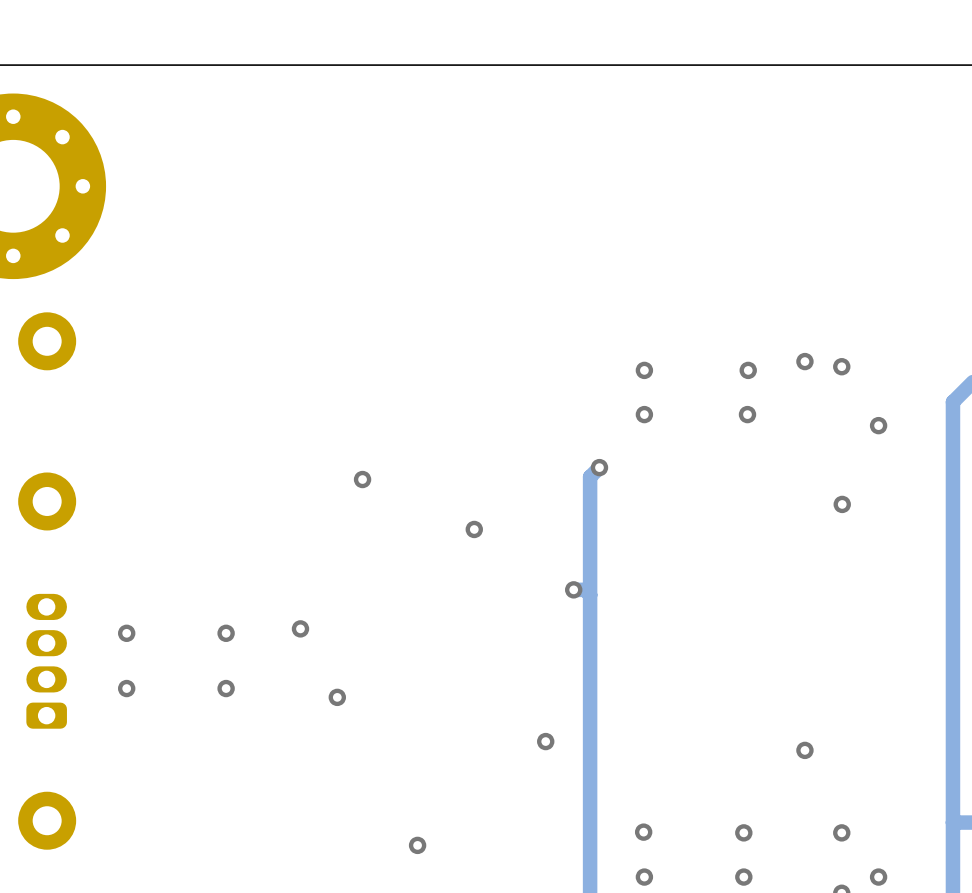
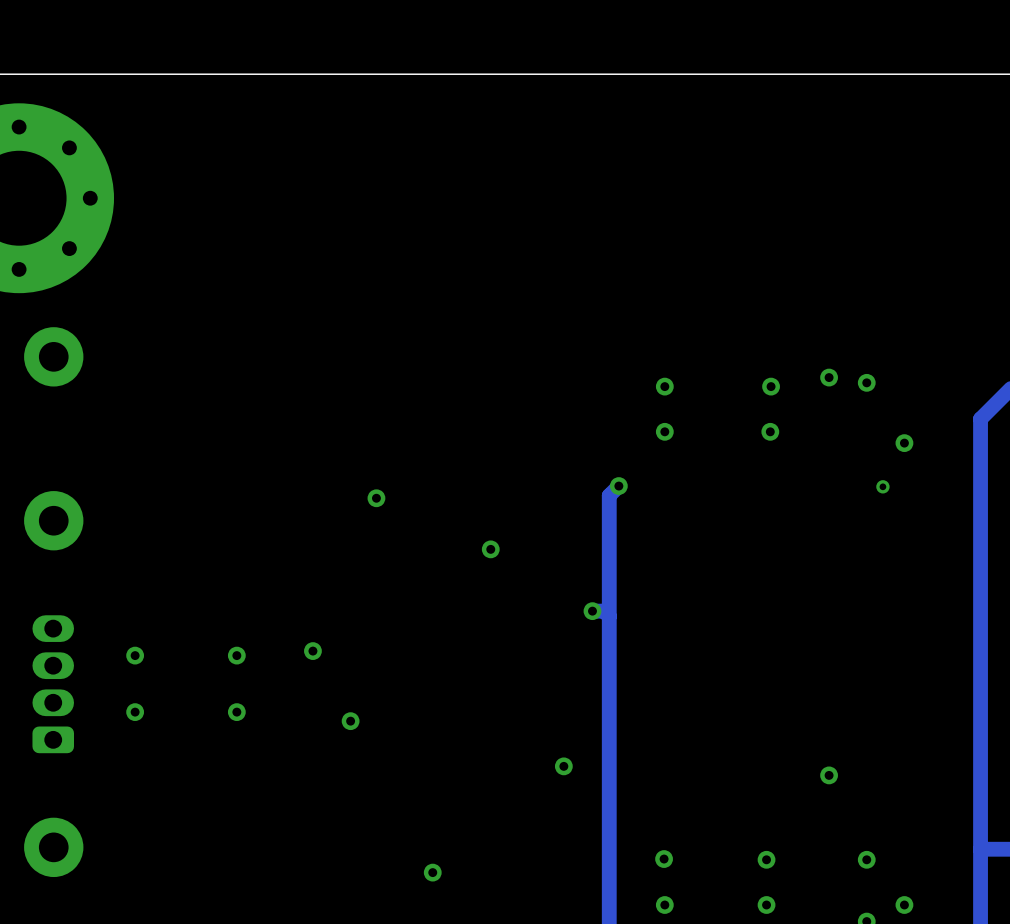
via: none -> (882, 486)
via: (842, 504) -> none

